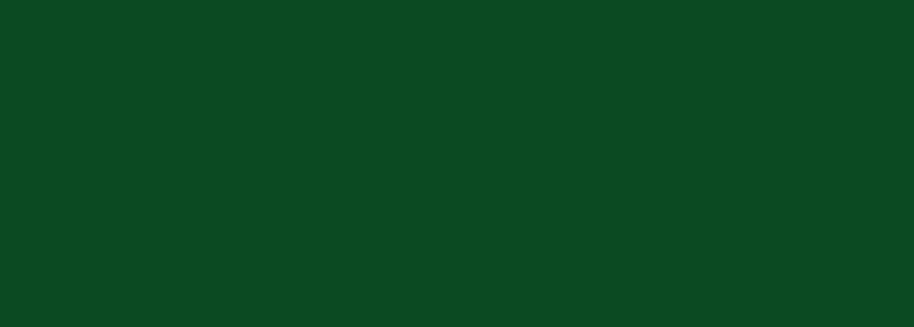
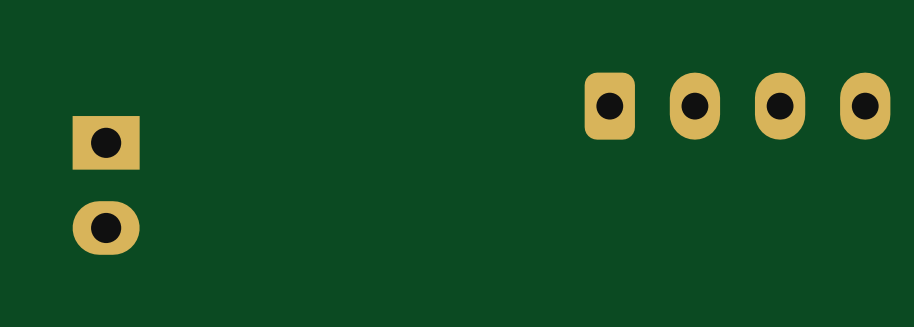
part: none -> (737, 106)
part: none -> (106, 185)

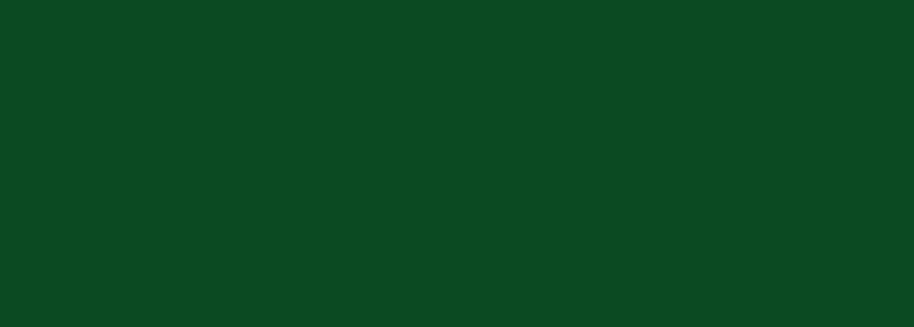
part: (737, 106) -> none
part: (106, 185) -> none

